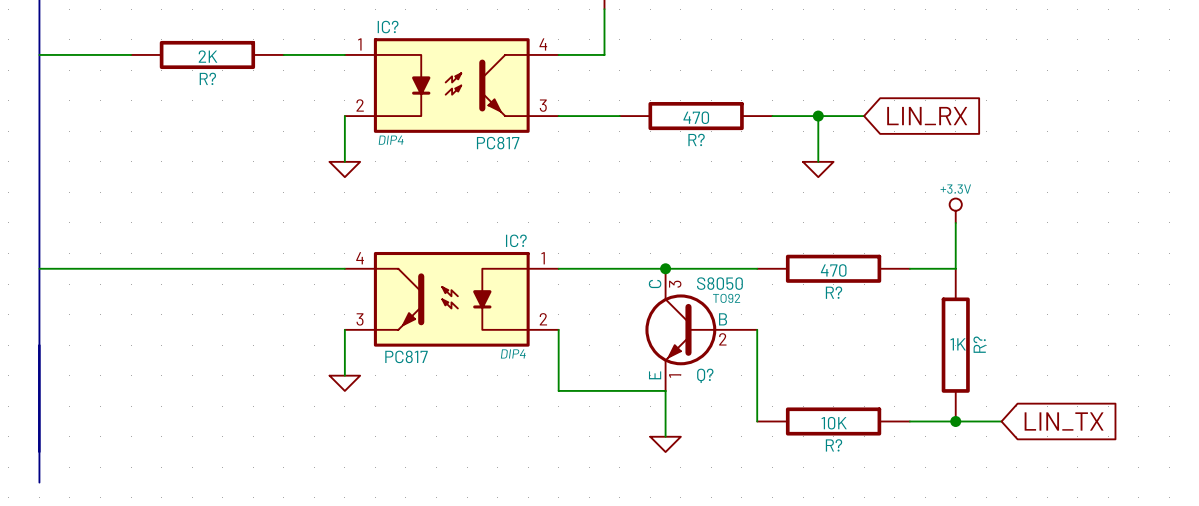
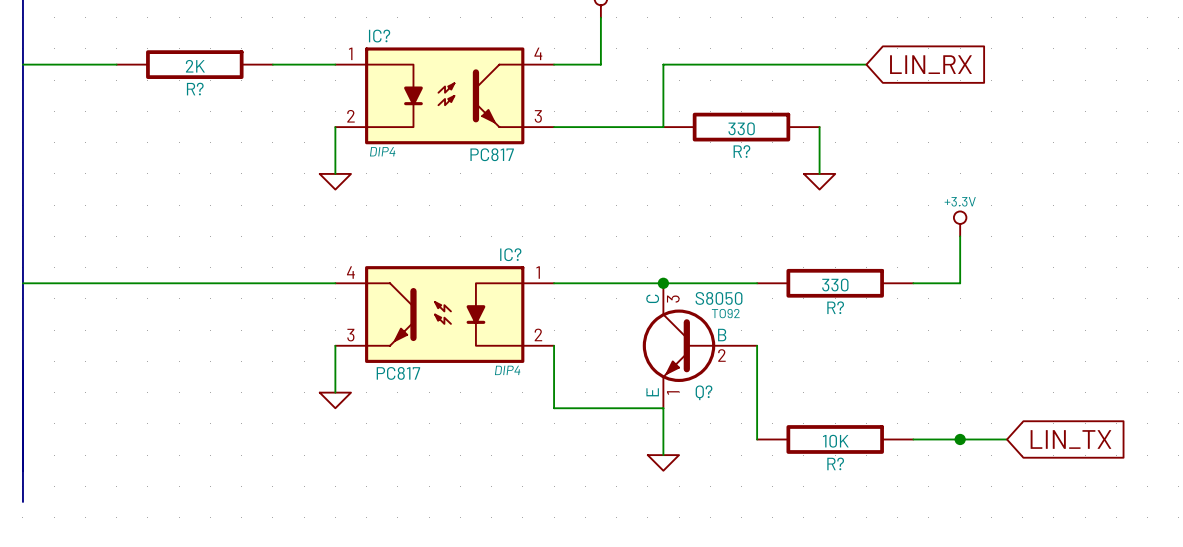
wire: none -> (866, 64) (663, 64) (663, 127) (616, 127)
R?: 470 (696, 116) -> none
R?: none -> 330 (741, 127)
wire: (772, 116) (864, 116) -> none
junction: (818, 116) -> none
global label position: LIN_RX (927, 116) -> LIN_RX (930, 64)
R? value: 470 (833, 270) -> 330 (835, 285)
R?: 1K (955, 345) -> none

